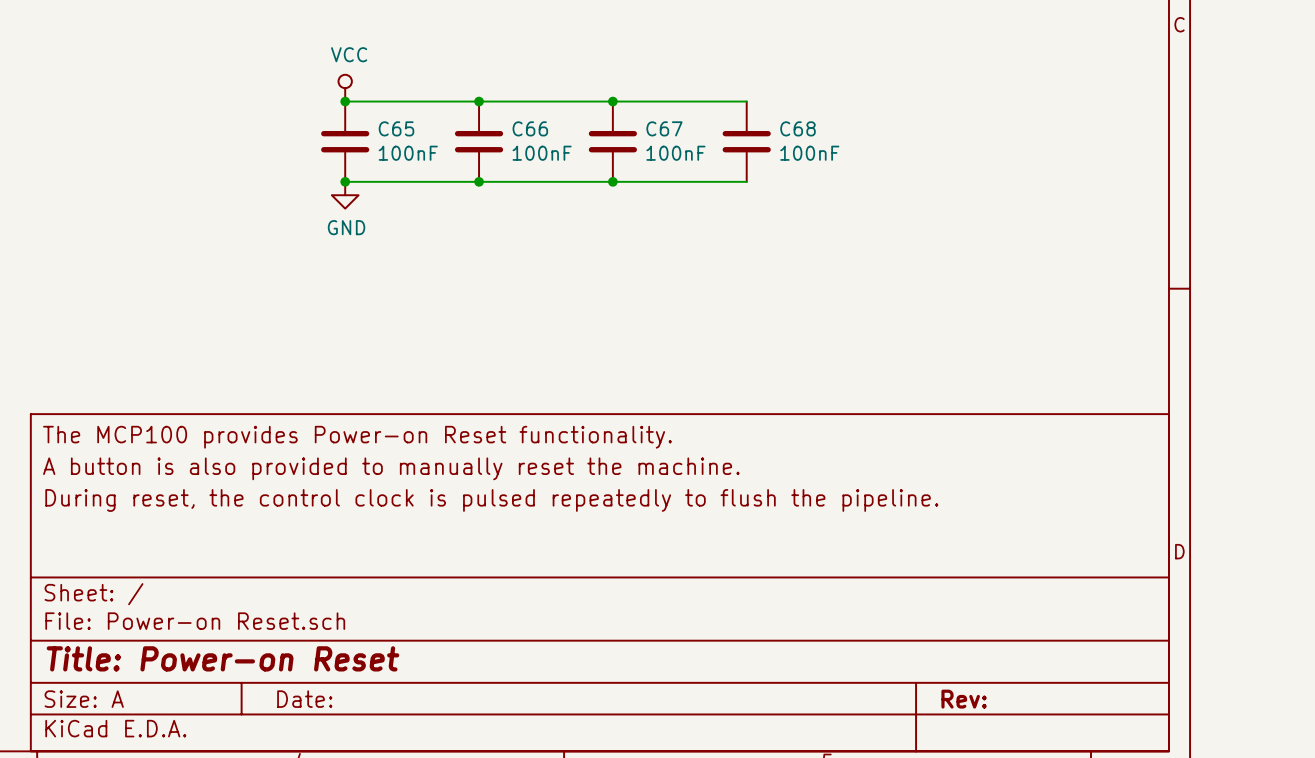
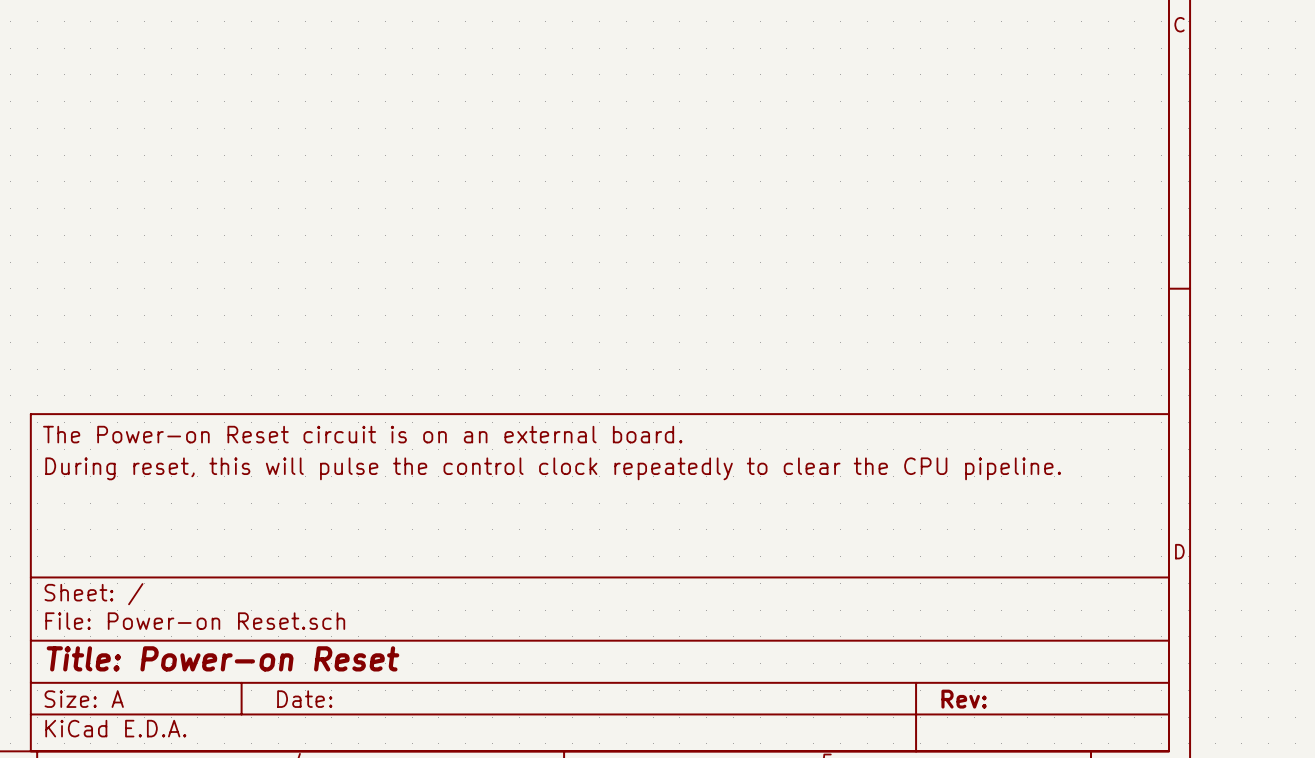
power symbol: VCC (345, 88) -> none
wire: (345, 101) (746, 101) -> none
junction: (345, 101) -> none
junction: (479, 101) -> none
junction: (612, 101) -> none
C65: 100nF (345, 141) -> none
C66: 100nF (479, 141) -> none
C67: 100nF (612, 141) -> none
C68: 100nF (746, 141) -> none
wire: (345, 181) (746, 181) -> none
junction: (345, 181) -> none
junction: (479, 181) -> none
junction: (612, 181) -> none
power symbol: GND (345, 195) -> none
title block: The MCP100 provides Power-on Reset functionality. (357, 437) -> The Power-on Reset circuit is on an external board. (362, 434)
title block: A button is also provided to manually reset the machine. (391, 468) -> During reset, this will pulse the control clock repeatedly to clear the CPU pipeline. (553, 468)
title block: During reset, the control clock is pulsed repeatedly to flush the pipeline. (491, 500) -> none

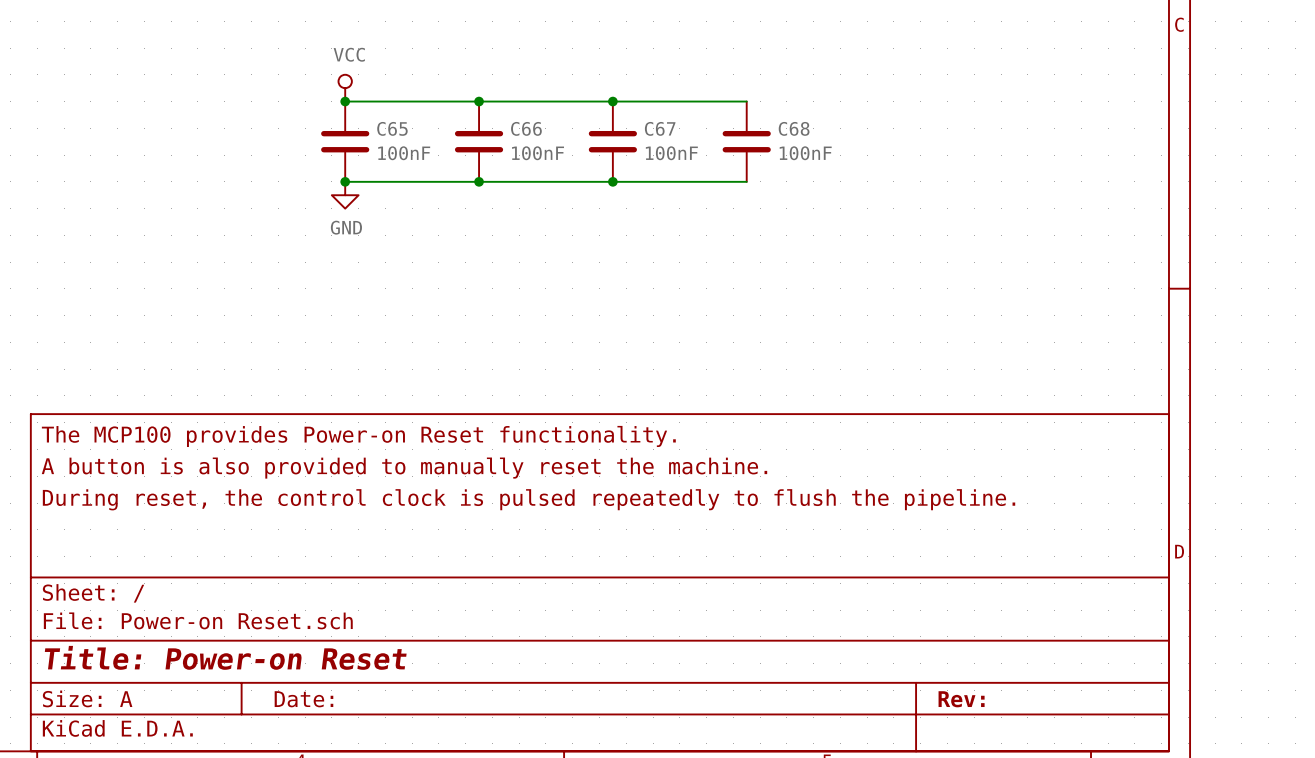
power symbol: none -> VCC (345, 88)
wire: none -> (345, 101) (746, 101)
junction: none -> (345, 101)
junction: none -> (479, 101)
junction: none -> (612, 101)
C65: none -> 100nF (345, 141)
C66: none -> 100nF (479, 141)
C67: none -> 100nF (612, 141)
C68: none -> 100nF (746, 141)
wire: none -> (345, 181) (746, 181)
junction: none -> (345, 181)
junction: none -> (479, 181)
junction: none -> (612, 181)
power symbol: none -> GND (345, 195)
title block: The Power-on Reset circuit is on an external board. (362, 434) -> The MCP100 provides Power-on Reset functionality. (358, 436)
title block: During reset, this will pulse the control clock repeatedly to clear the CPU pipeline. (553, 468) -> A button is also provided to manually reset the machine. (404, 468)
title block: none -> During reset, the control clock is pulsed repeatedly to flush the pipeline. (529, 499)

